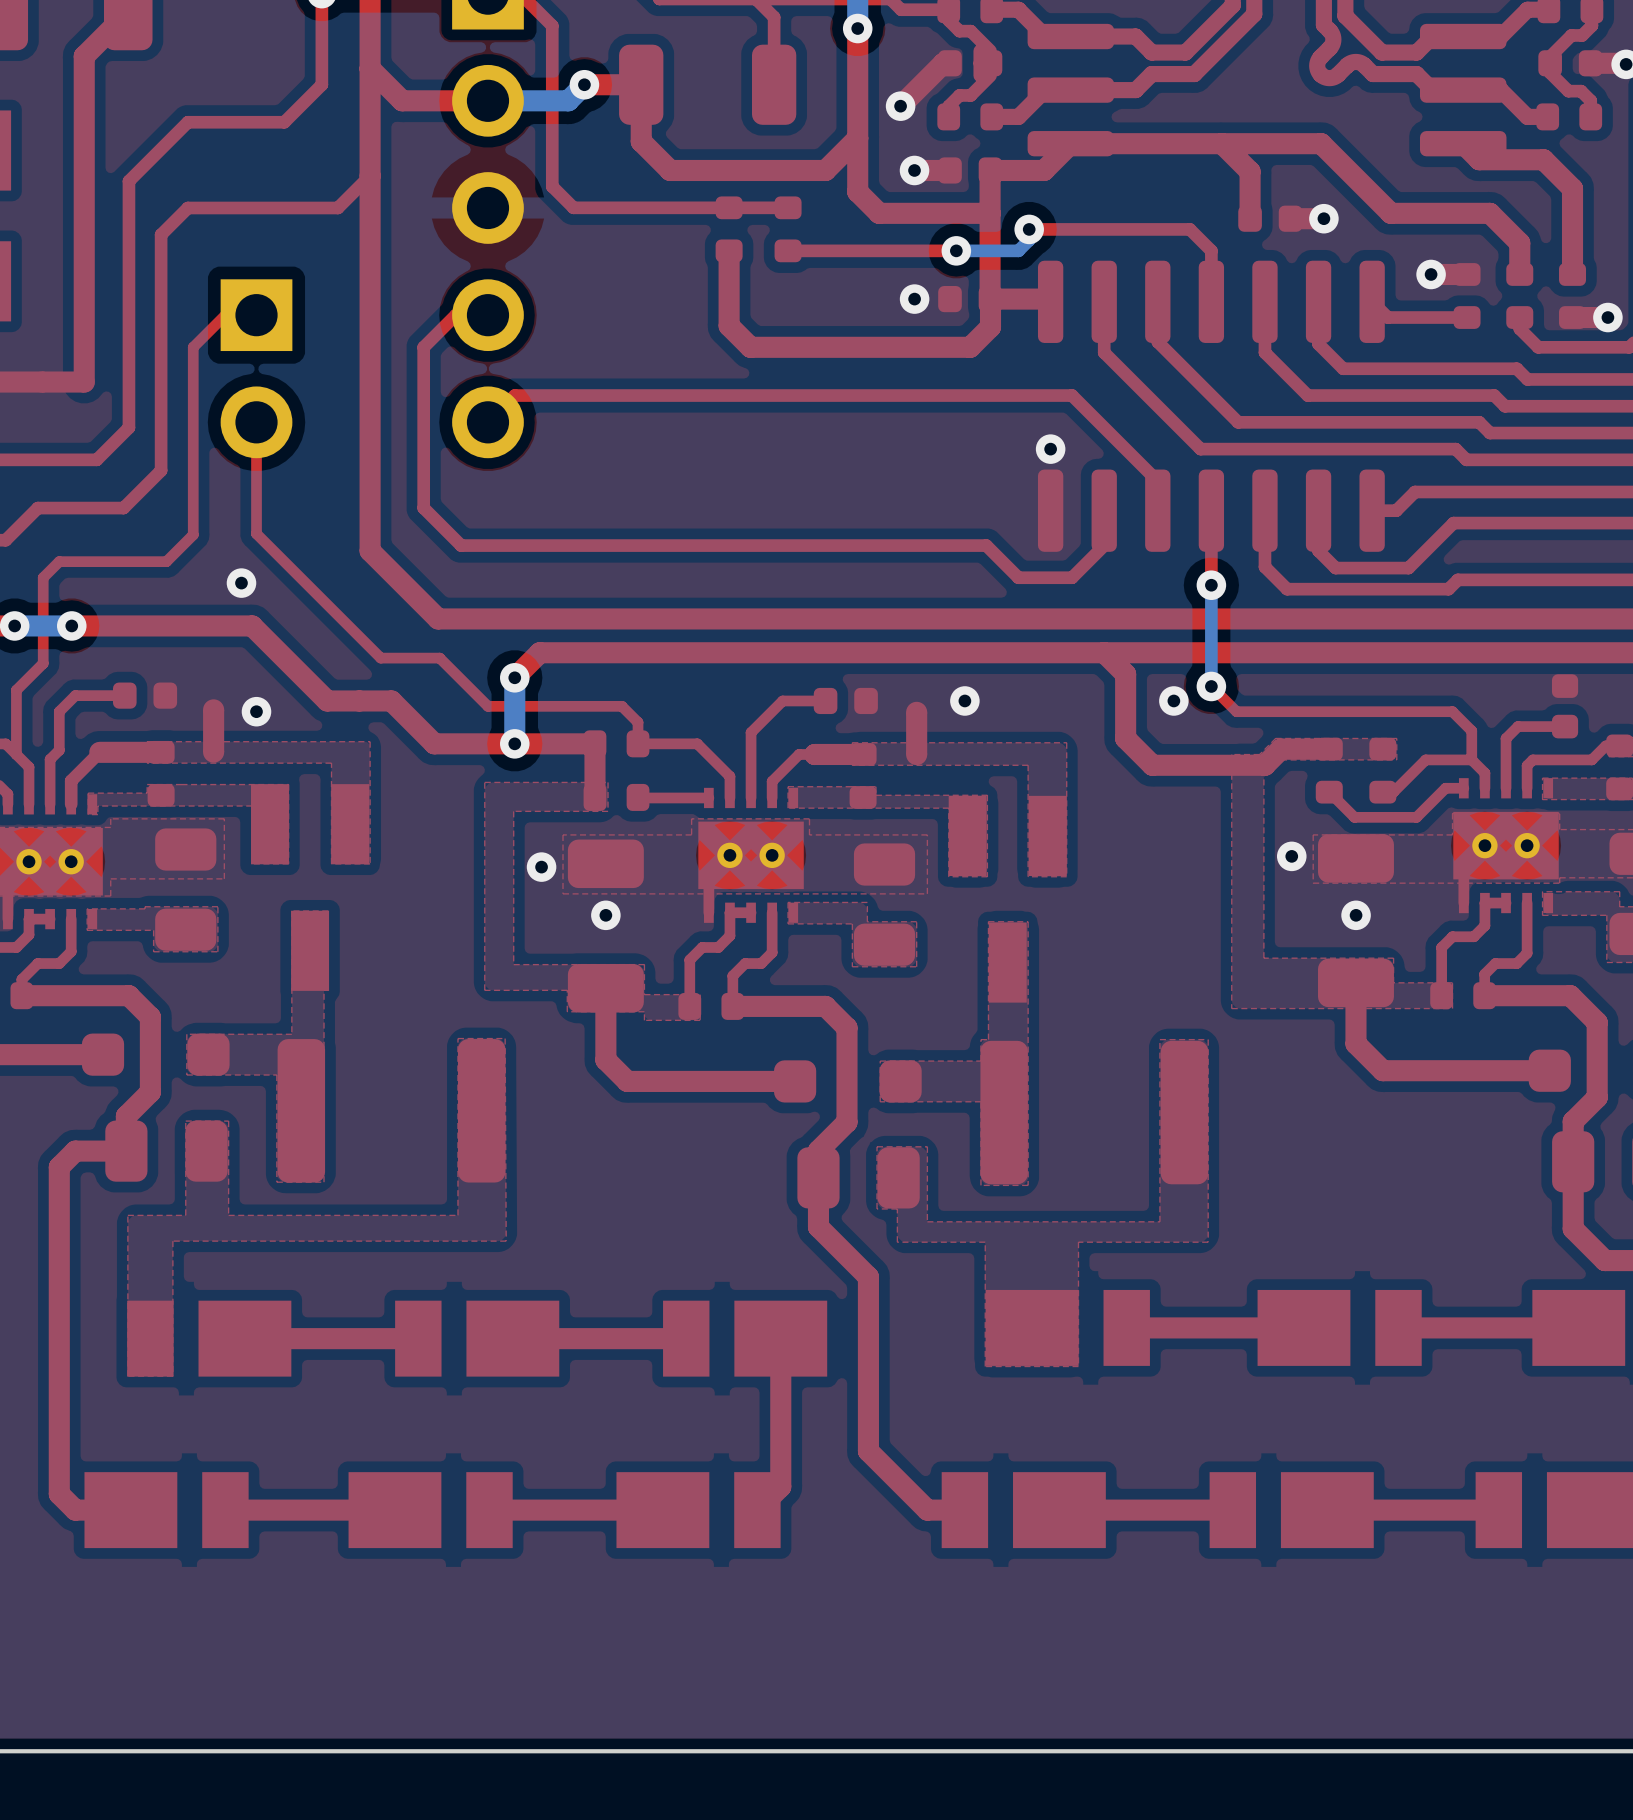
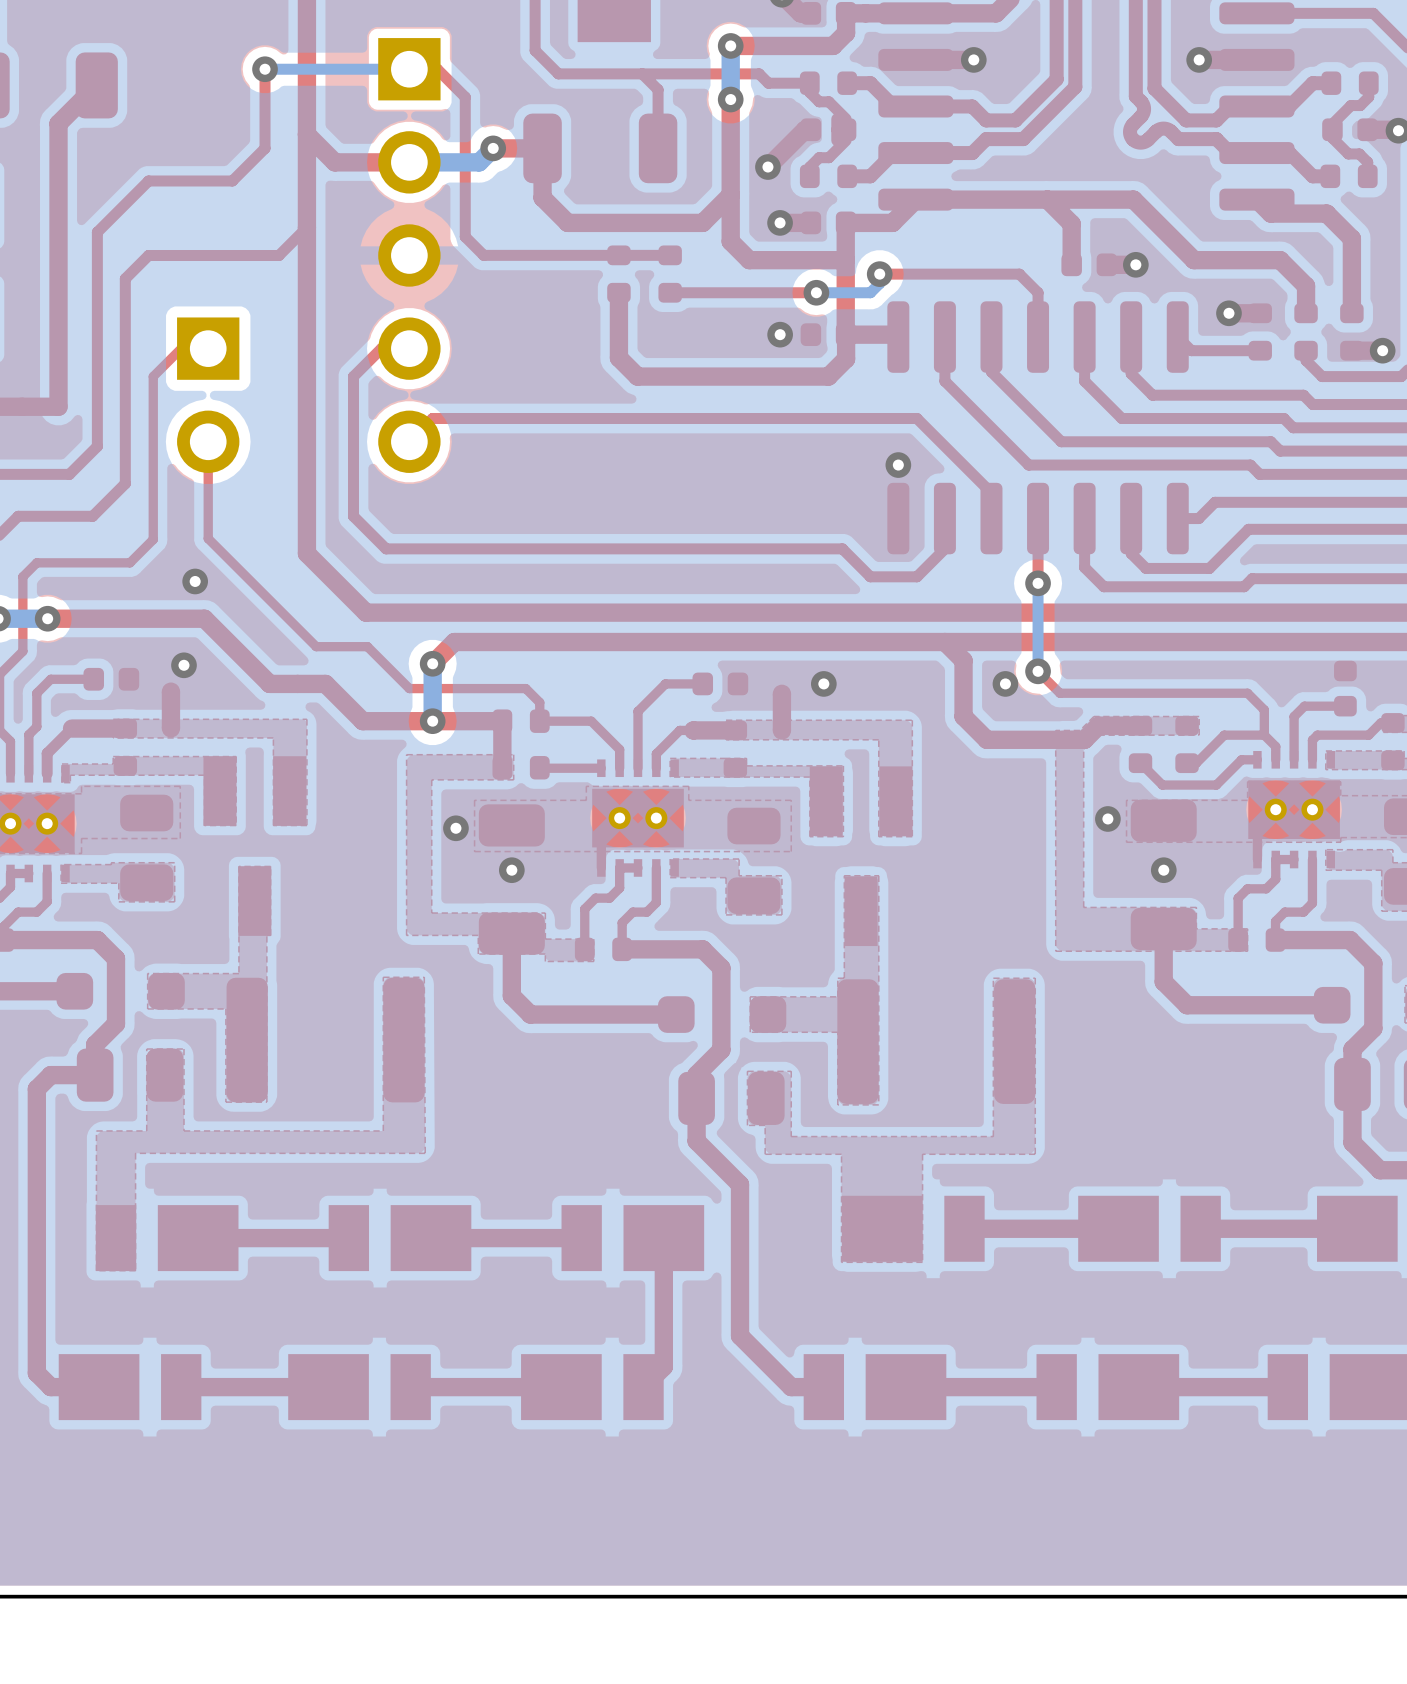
via position: (256, 711) -> (183, 665)

